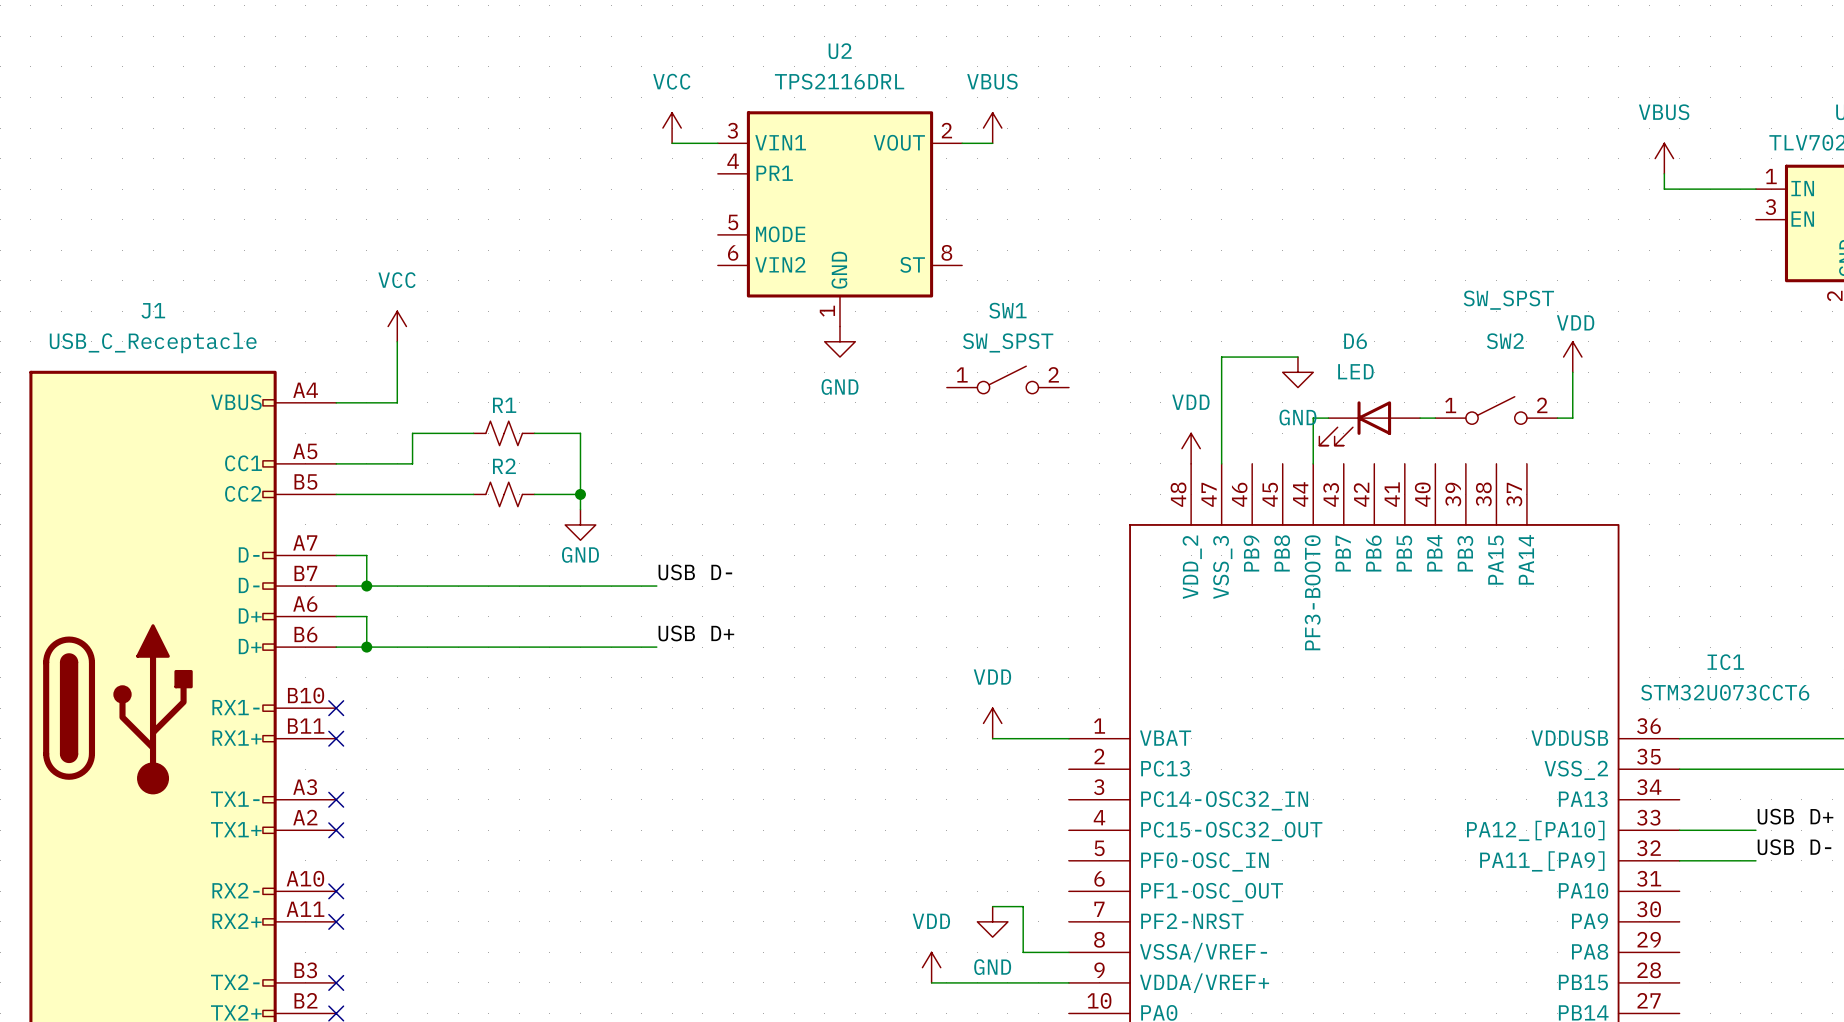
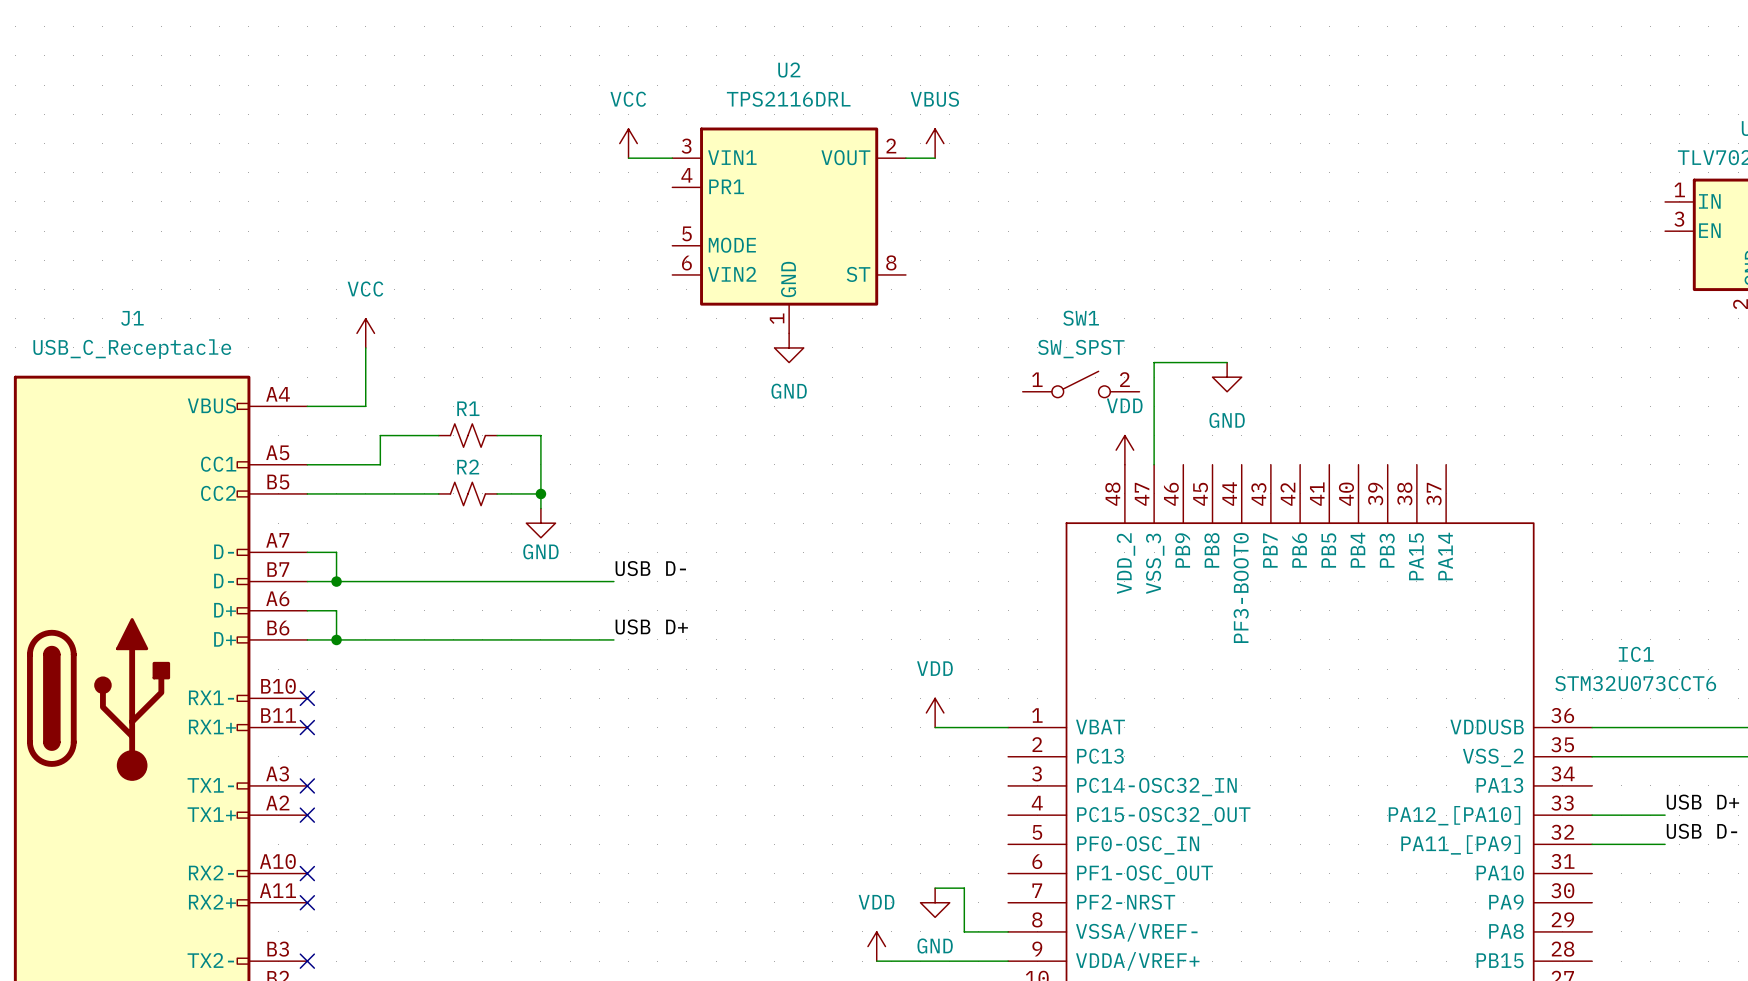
power symbol: VBUS (1664, 158) -> none
wire: (1664, 173) (1664, 189) (1755, 189) -> none
power symbol: VDD (1572, 357) -> none
wire: (1572, 372) (1572, 418) (1557, 418) -> none
SW1 position: (1007, 379) -> (1081, 384)
SW2: SW_SPST (1496, 410) -> none
wire: (1328, 418) (1313, 418) (1313, 463) -> none
wire: (1420, 418) (1435, 418) -> none
D6: LED (1369, 423) -> none

